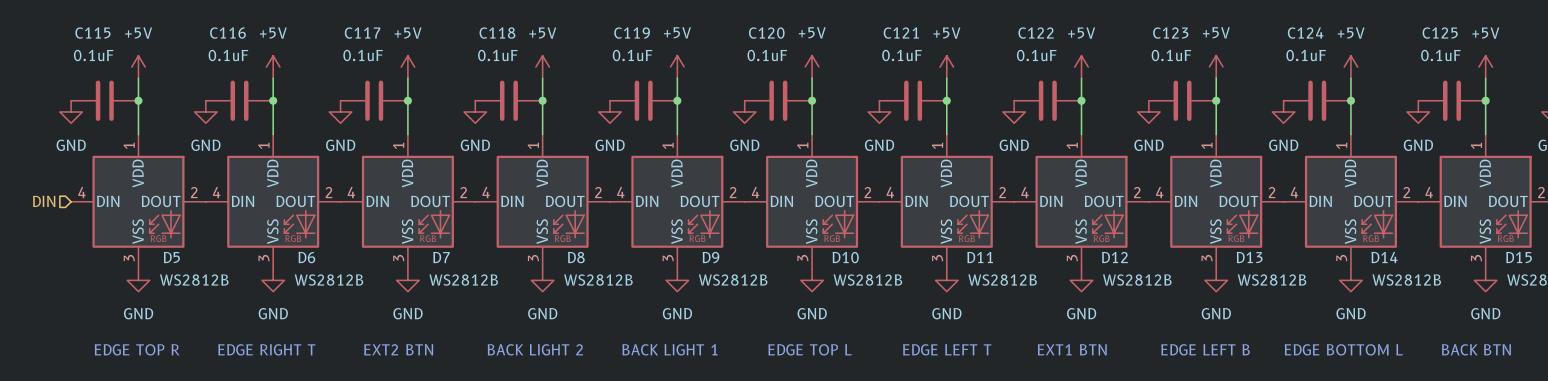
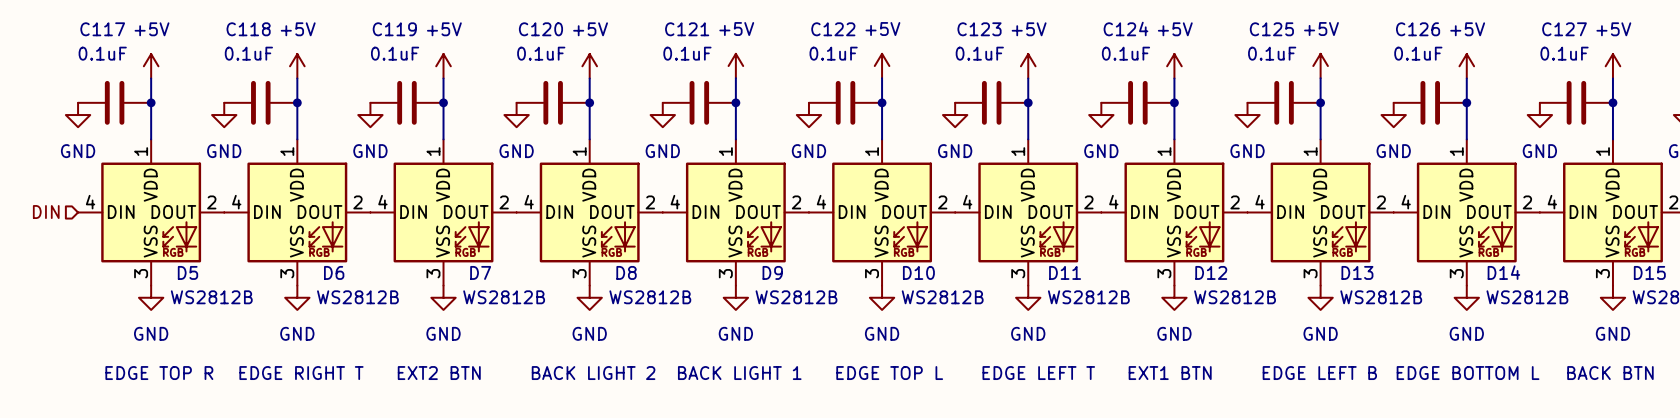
C115 name: C115 (92, 33) -> C117 (102, 29)
C116 name: C116 (227, 33) -> C118 (248, 29)
C117 name: C117 (362, 33) -> C119 (394, 29)
C118 name: C118 (497, 33) -> C120 (540, 29)
C119 name: C119 (632, 33) -> C121 (687, 29)
C120 name: C120 (766, 33) -> C122 (833, 29)
C121 name: C121 (901, 33) -> C123 (979, 29)
C122 name: C122 (1036, 33) -> C124 (1125, 29)
C123 name: C123 (1170, 33) -> C125 (1271, 29)
C124 name: C124 (1305, 33) -> C126 (1418, 29)
C125 name: C125 (1440, 33) -> C127 (1564, 29)

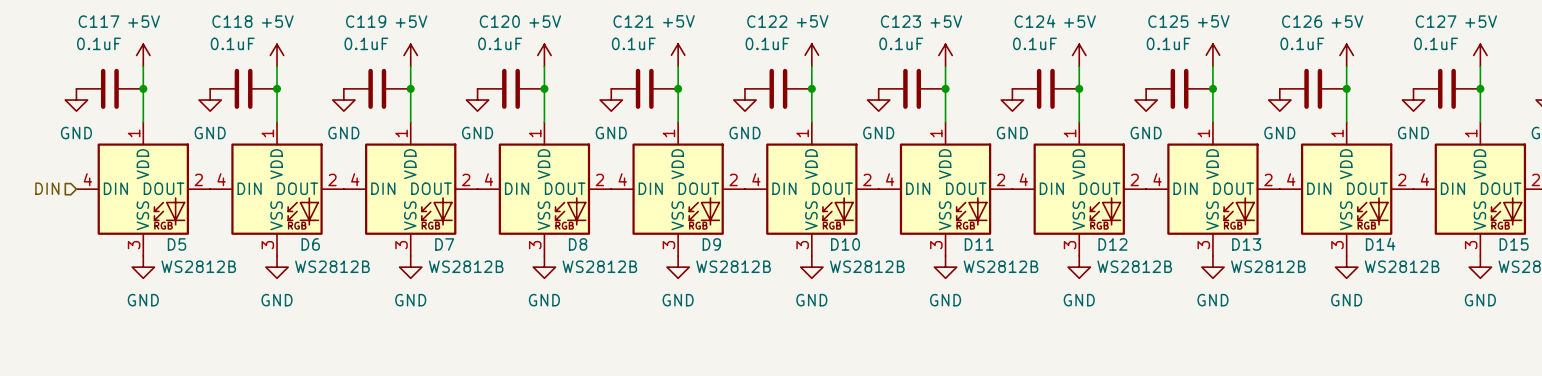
text: EDGE TOP R (159, 373) -> none
text: EDGE RIGHT T (301, 373) -> none
text: EXT2 BTN (439, 373) -> none
text: BACK LIGHT 2 (593, 373) -> none
text: BACK LIGHT 1 (739, 373) -> none
text: EDGE TOP L (889, 373) -> none
text: EDGE LEFT T (1038, 373) -> none
text: EXT1 BTN (1170, 373) -> none
text: EDGE LEFT B (1319, 373) -> none
text: EDGE BOTTOM L (1468, 373) -> none
text: BACK BTN (1610, 373) -> none

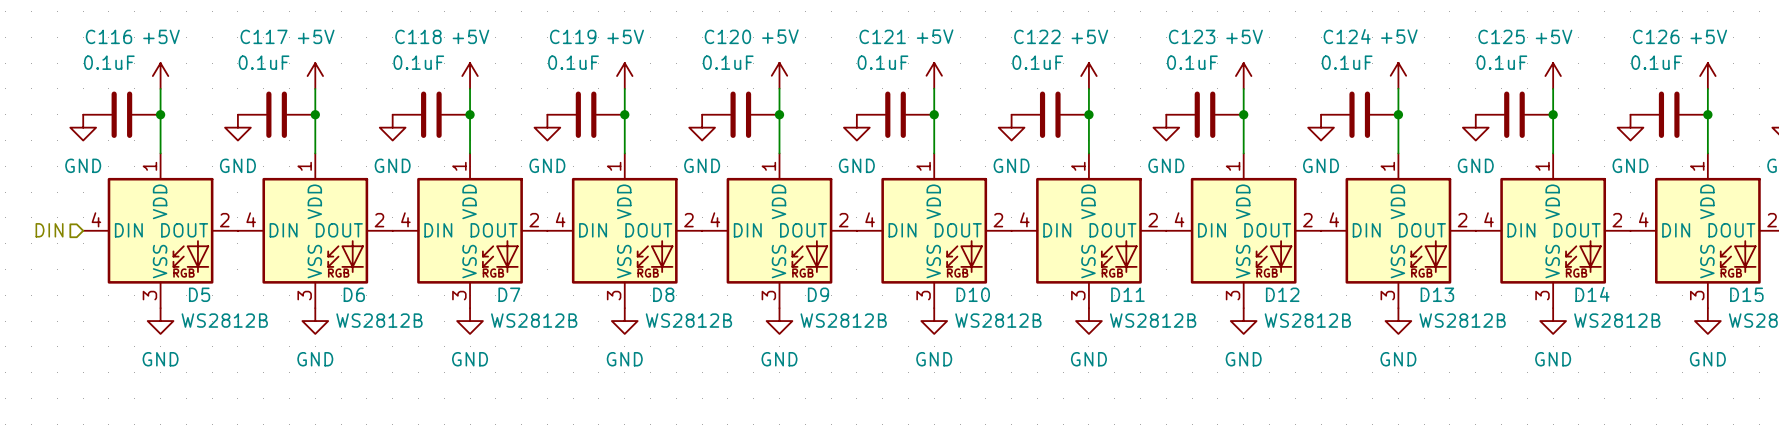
C117 name: C117 (99, 21) -> C116 (108, 36)
C118 name: C118 (232, 21) -> C117 (264, 36)
C119 name: C119 (366, 21) -> C118 (418, 36)
C120 name: C120 (499, 21) -> C119 (573, 36)
C121 name: C121 (633, 21) -> C120 (727, 36)
C122 name: C122 (767, 21) -> C121 (882, 36)
C123 name: C123 (900, 21) -> C122 (1037, 36)
C124 name: C124 (1034, 21) -> C123 (1192, 36)
C125 name: C125 (1168, 21) -> C124 (1347, 36)
C126 name: C126 (1302, 21) -> C125 (1501, 36)
C127 name: C127 (1436, 21) -> C126 (1656, 36)

